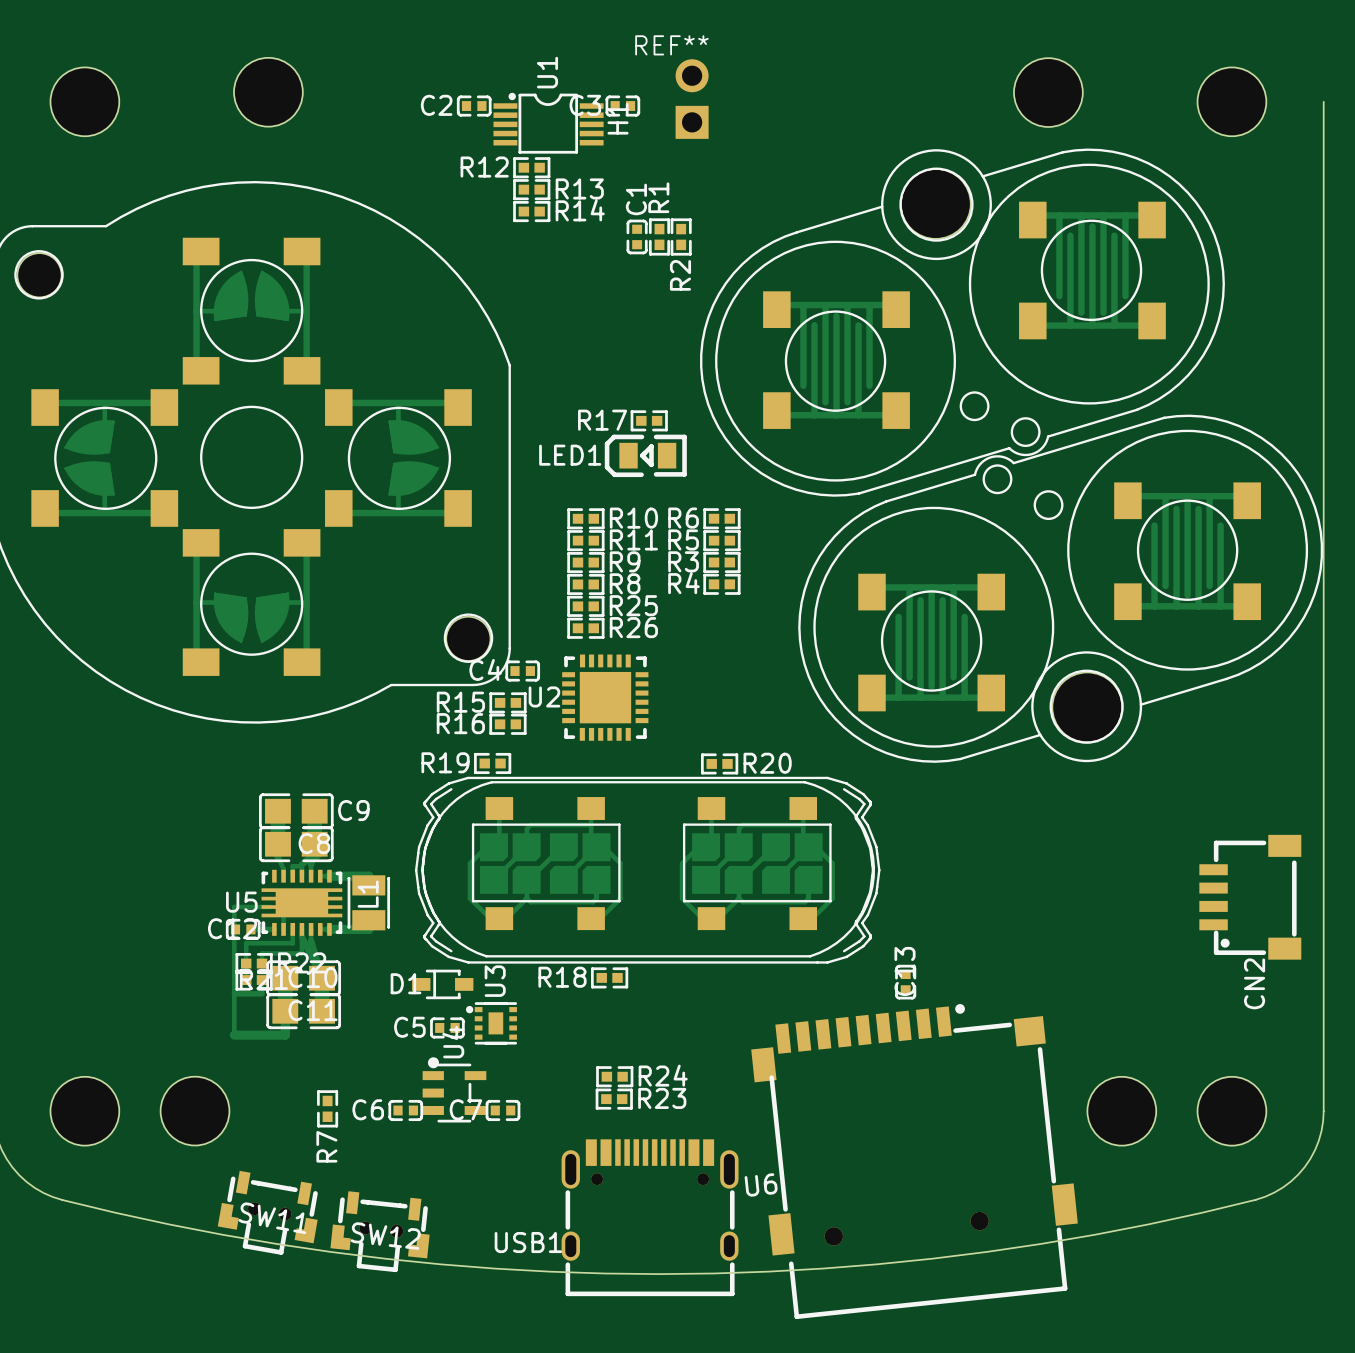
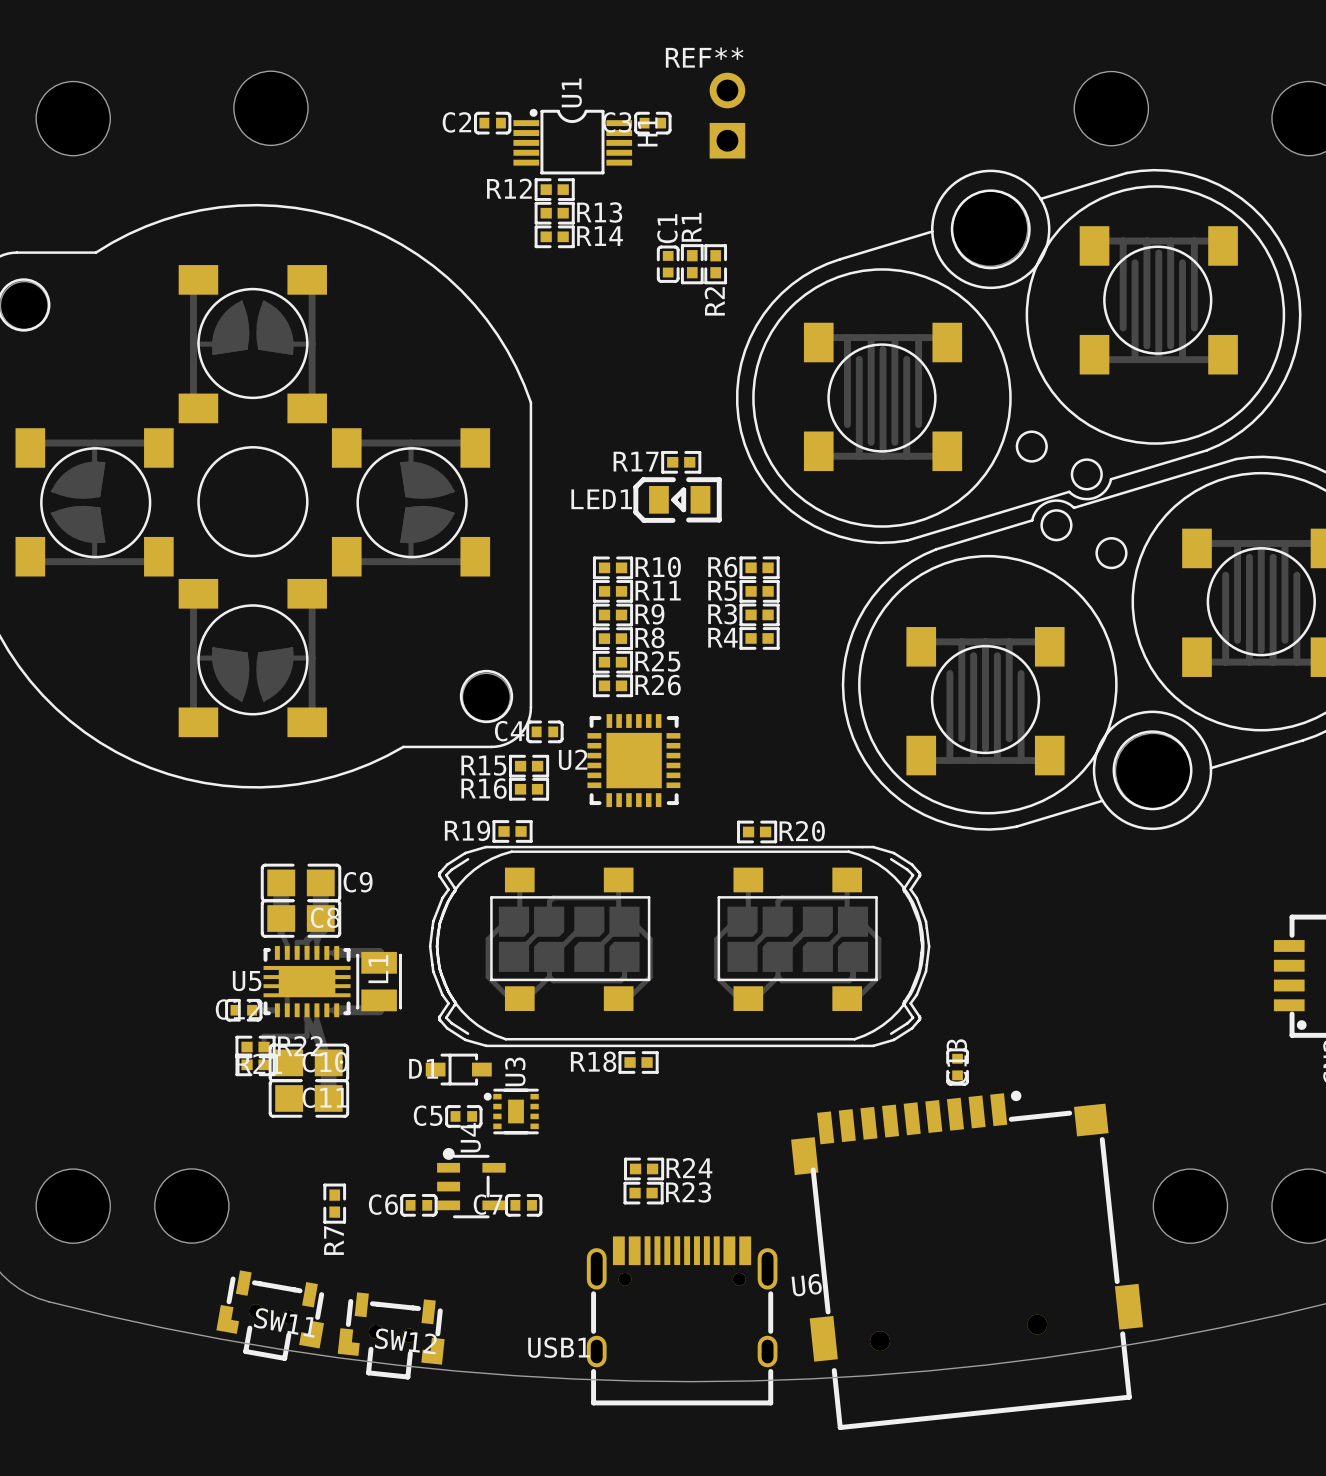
track: (270, 907) (234, 907) (234, 1035) (285, 1035) (285, 978) -> none
track: (292, 929) (292, 943) (246, 943) (246, 980) -> none
track: (262, 980) (262, 993) (234, 993) -> none

